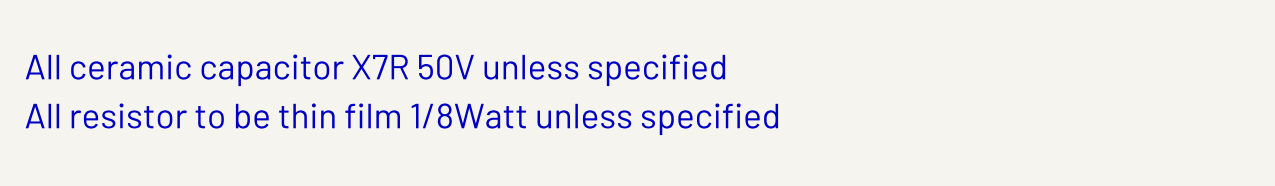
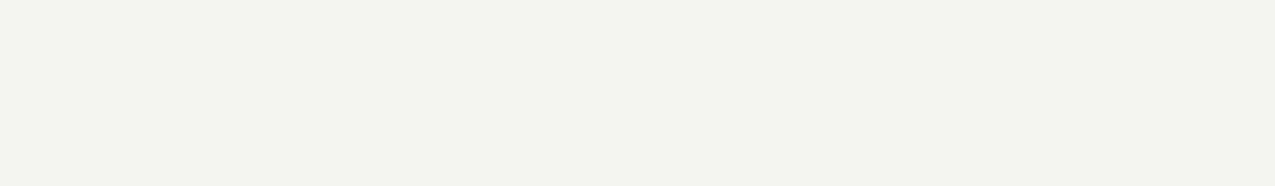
text: All ceramic capacitor X7R 50V unless specified (375, 70) -> none
text: All resistor to be thin film 1/8Watt unless specified (401, 119) -> none

